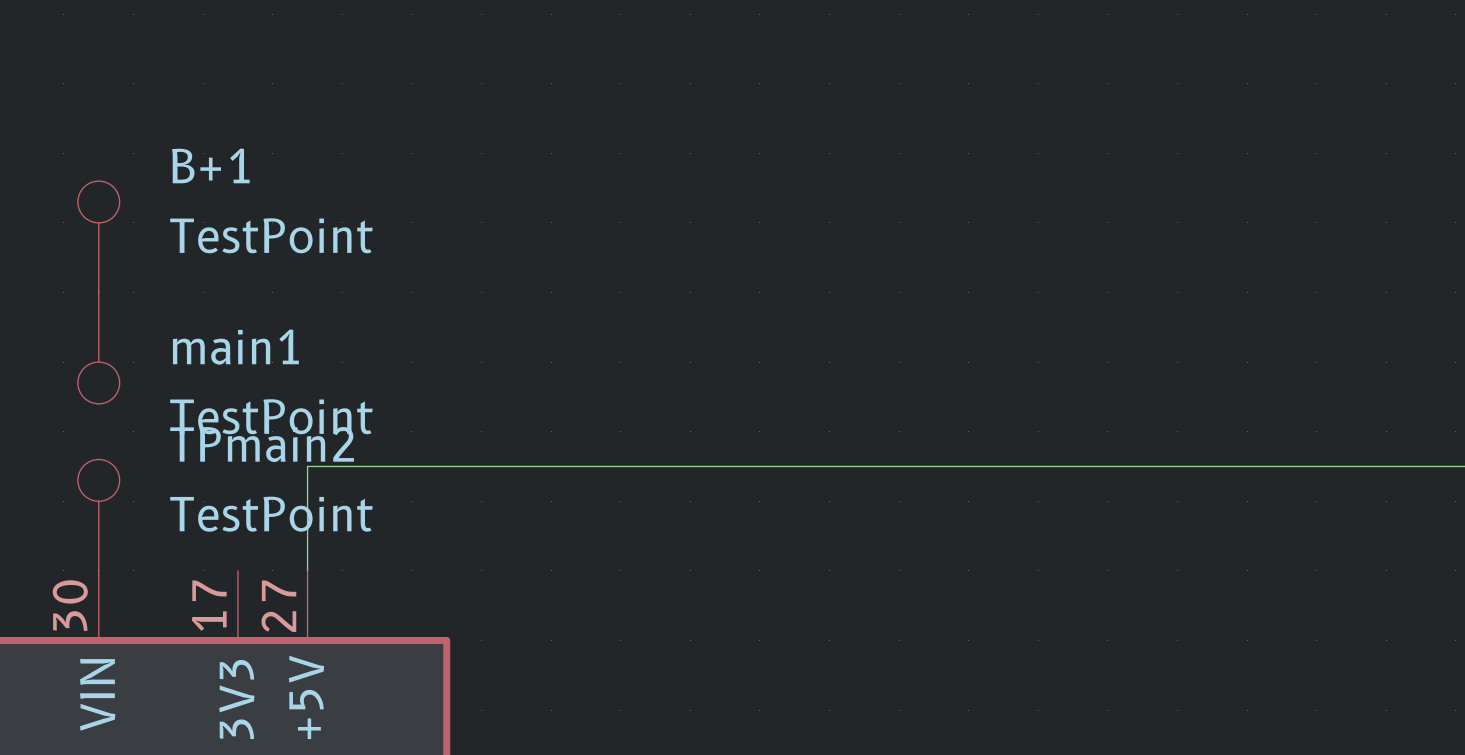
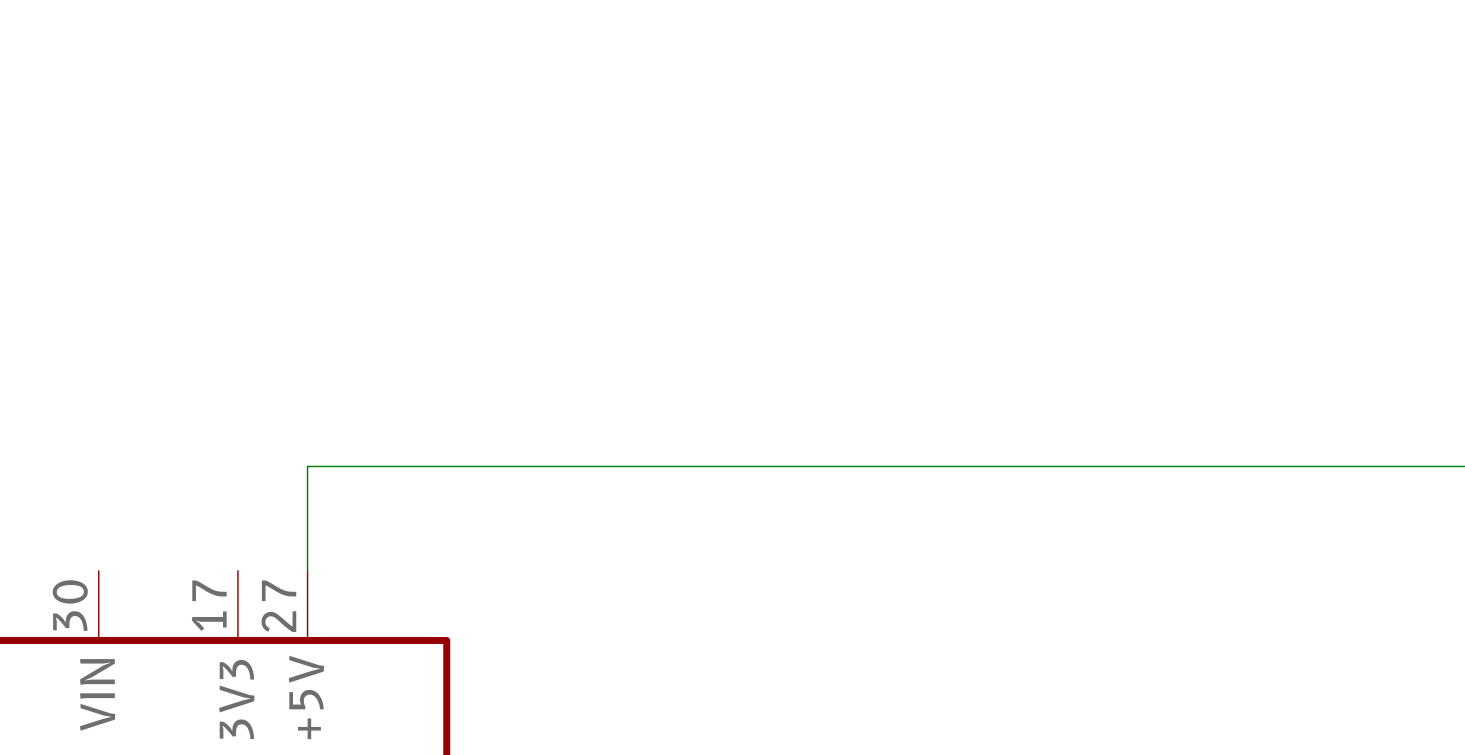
B+1: TestPoint (98, 236) -> none
main1: TestPoint (98, 348) -> none
TPmain2: TestPoint (98, 515) -> none

